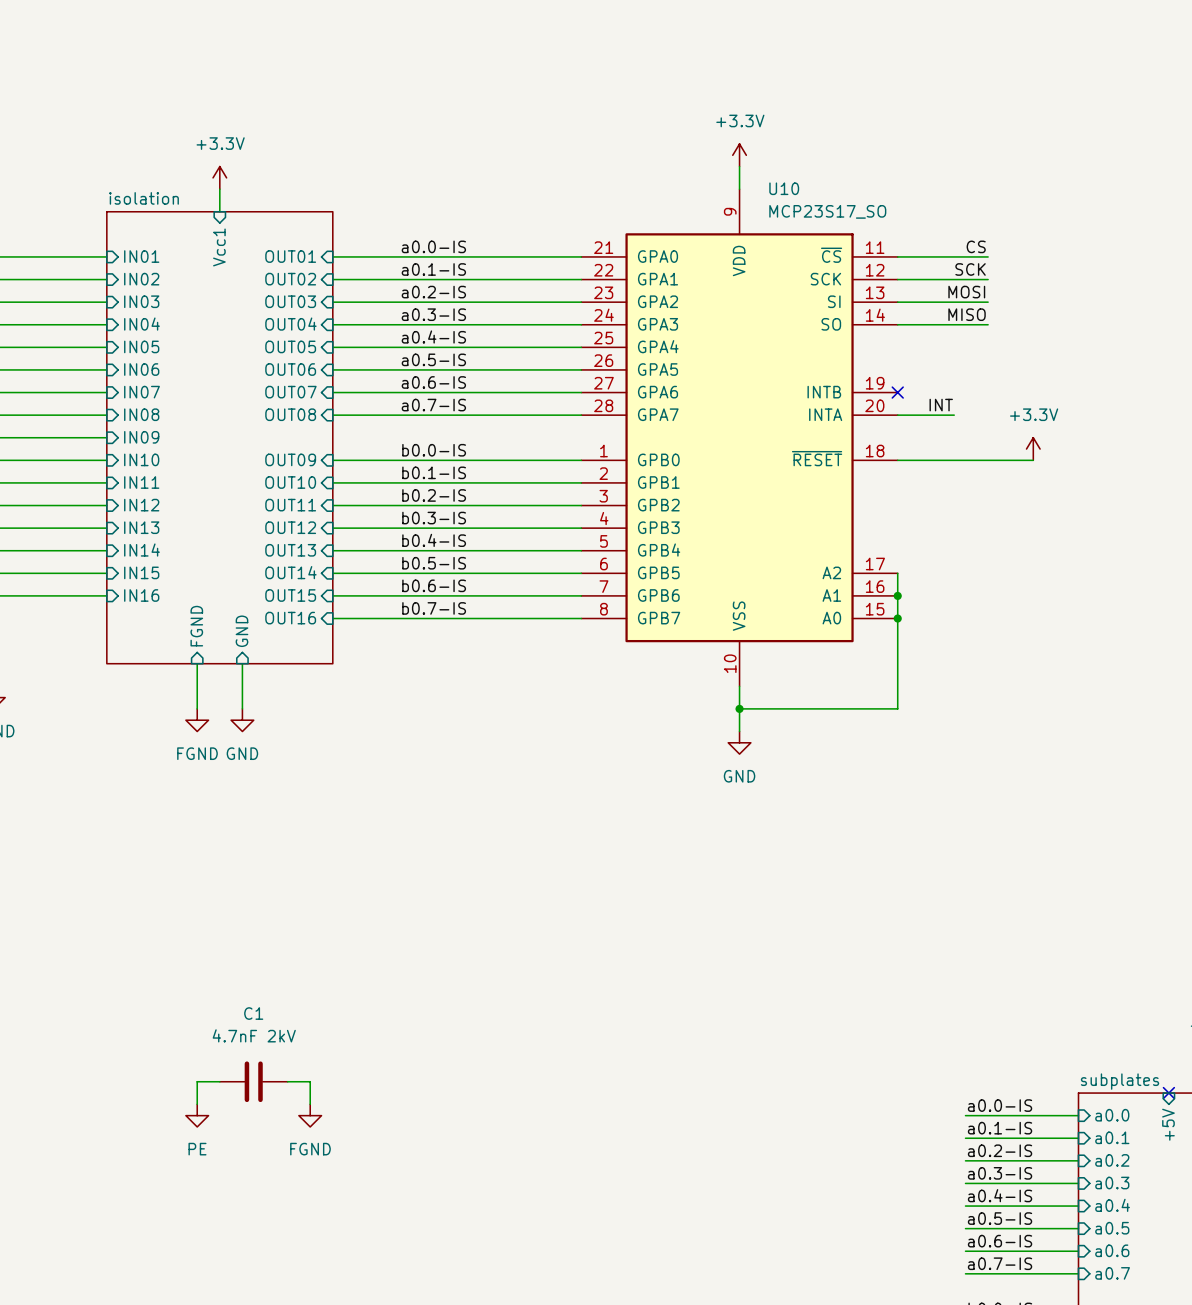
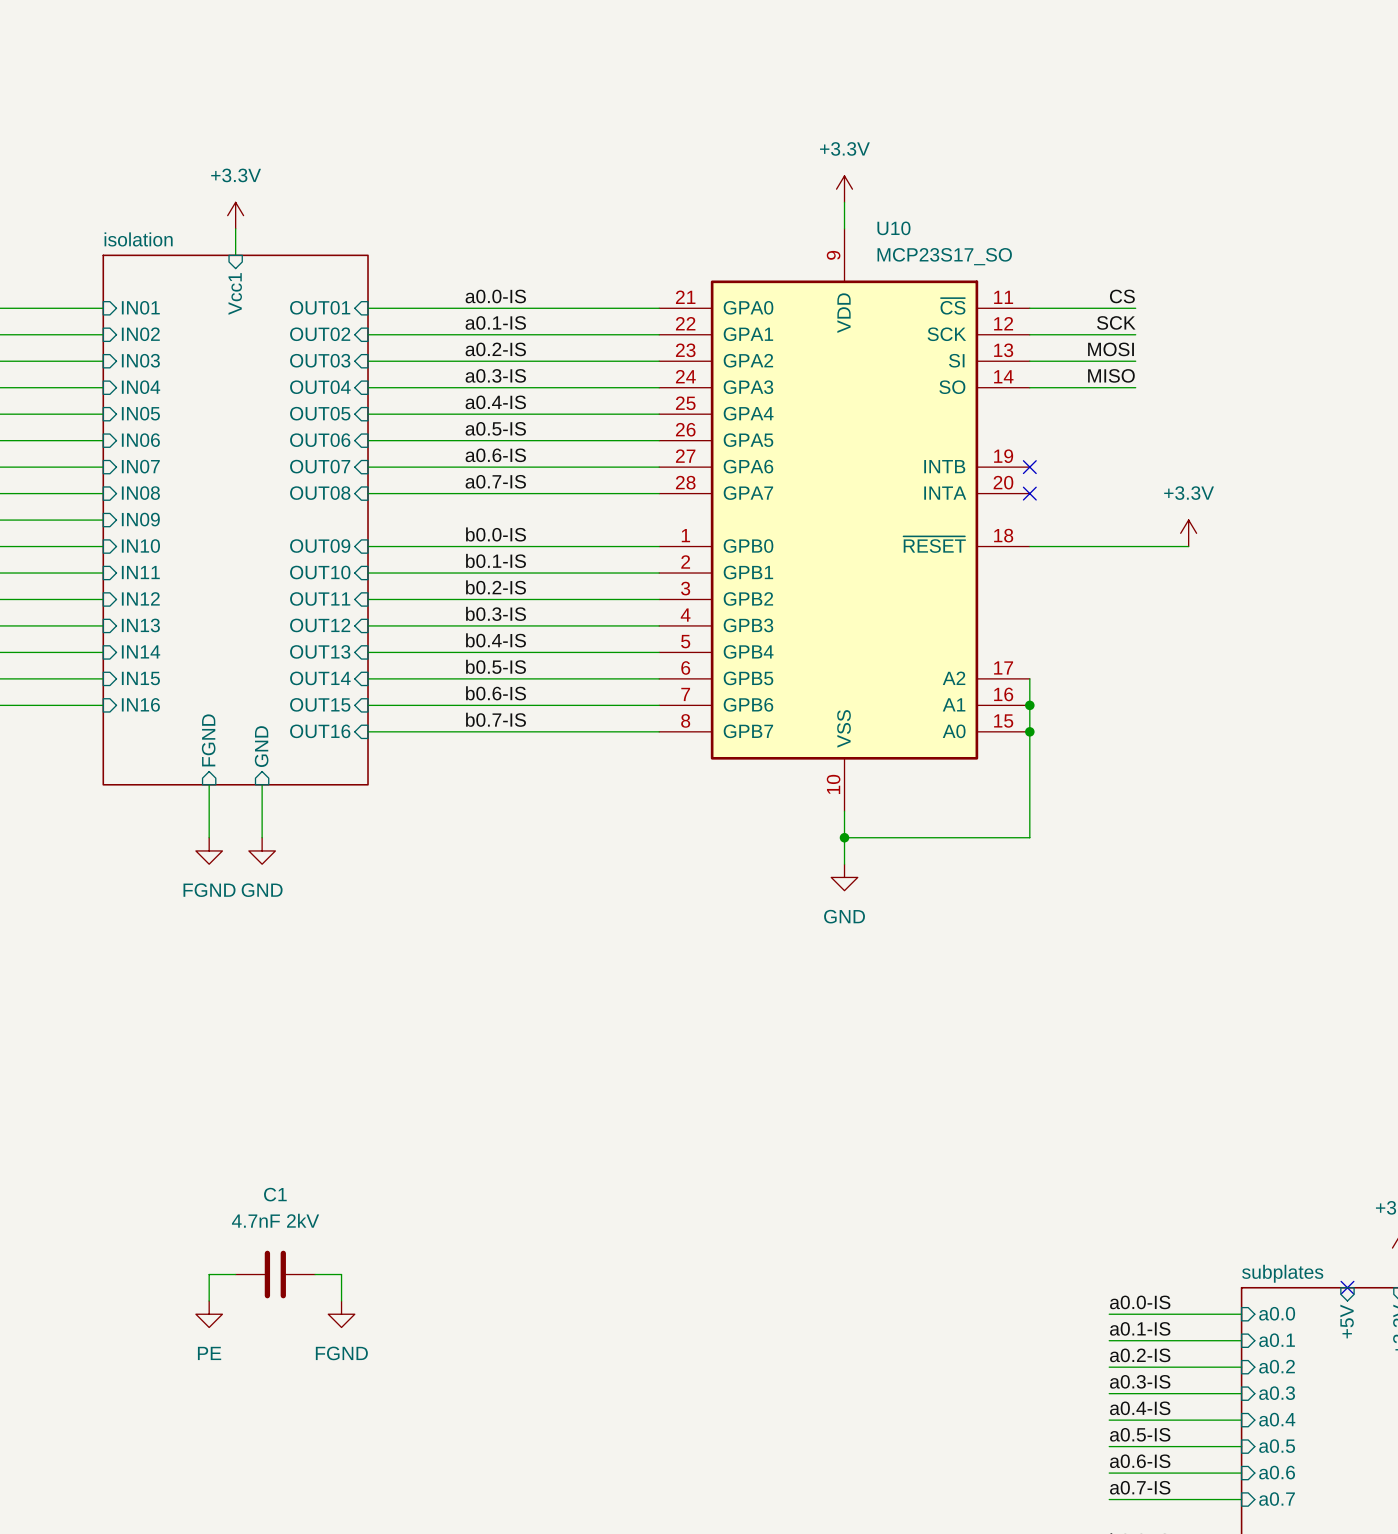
label: INT (941, 405) -> none
wire: (897, 415) (954, 415) -> none
no-connect mark: none -> (1029, 493)

